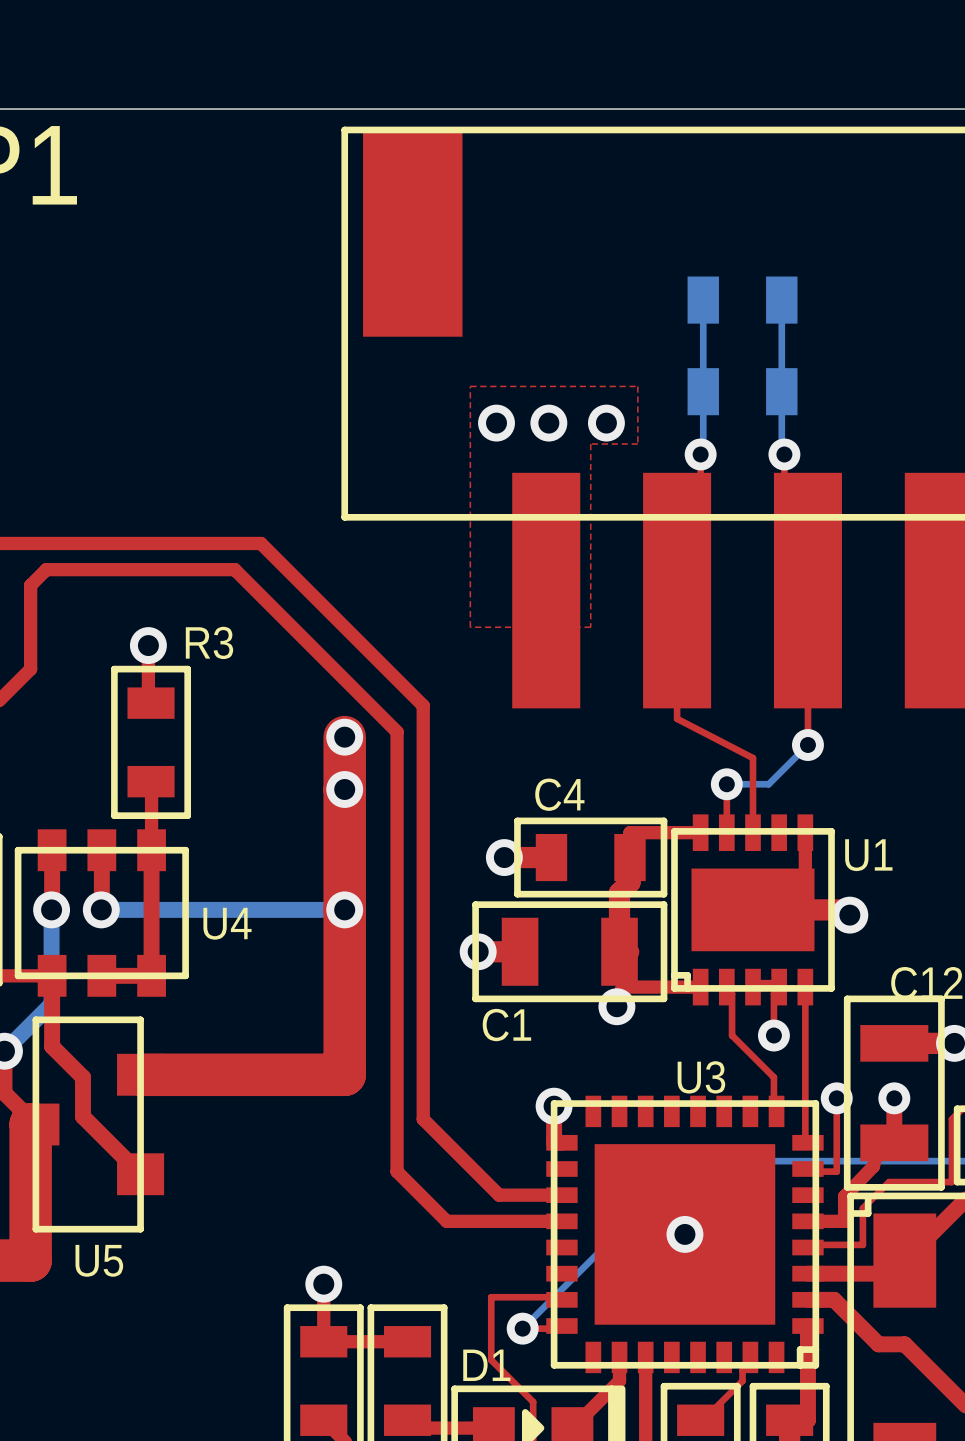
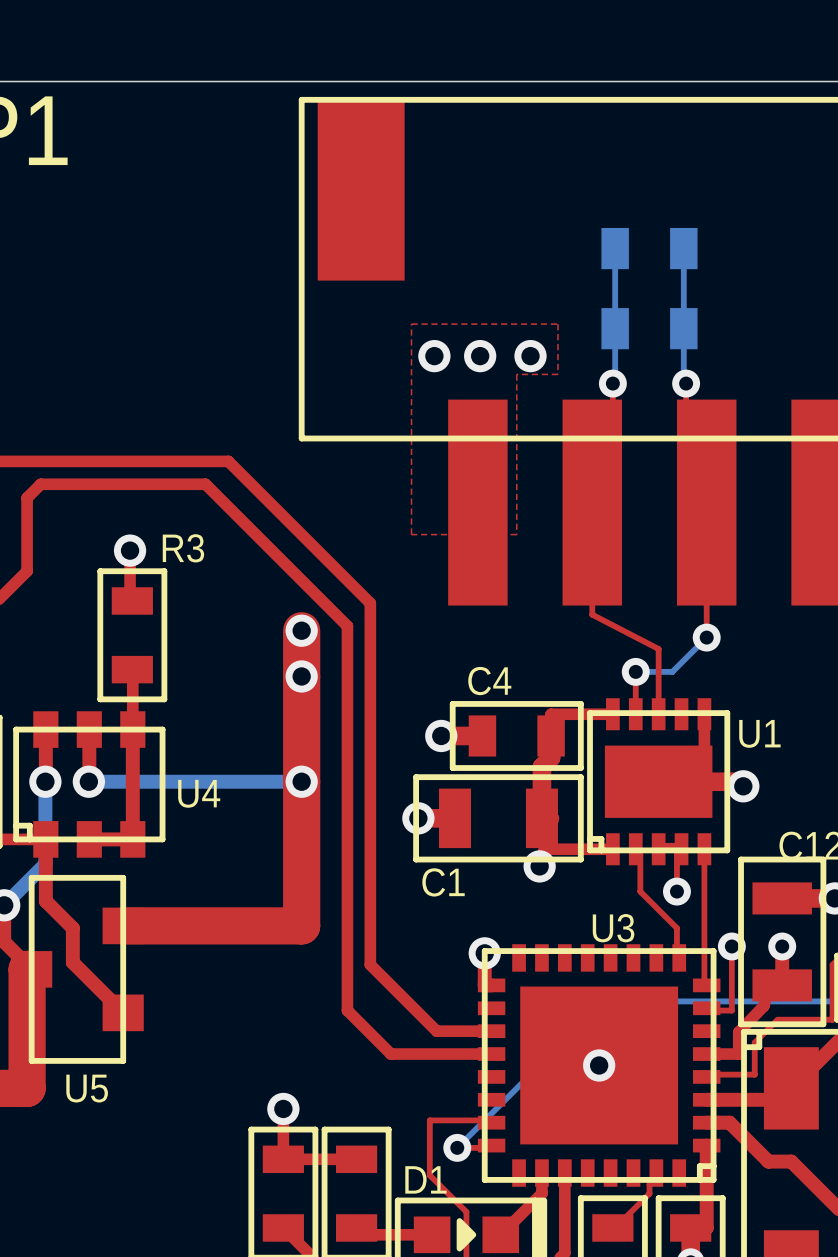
U4 footprint: [14, 829, 189, 997] -> [13, 711, 166, 858]

